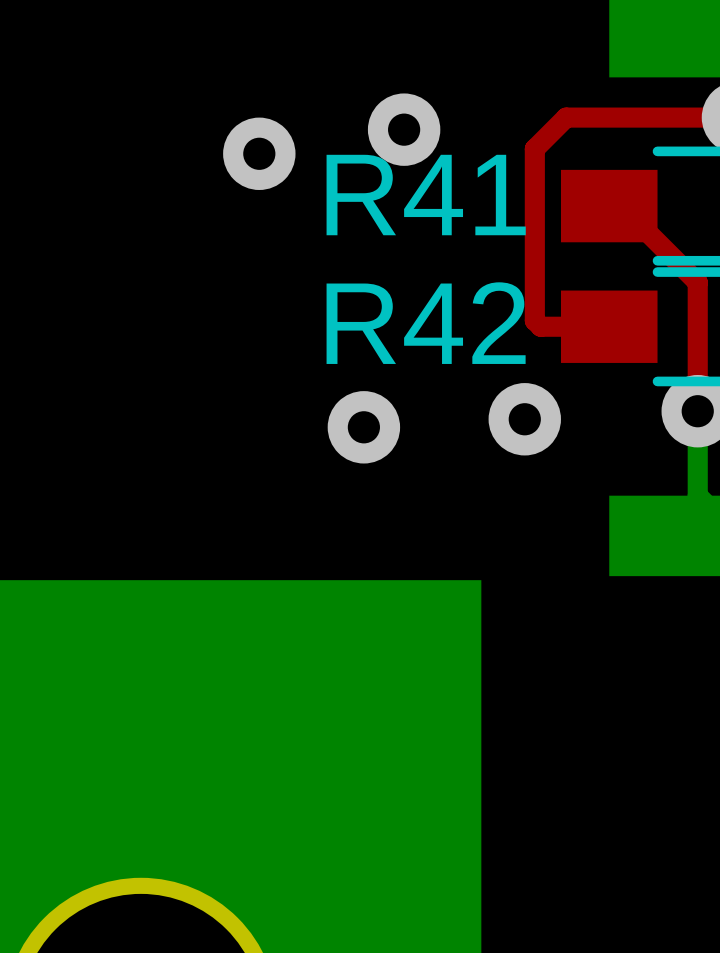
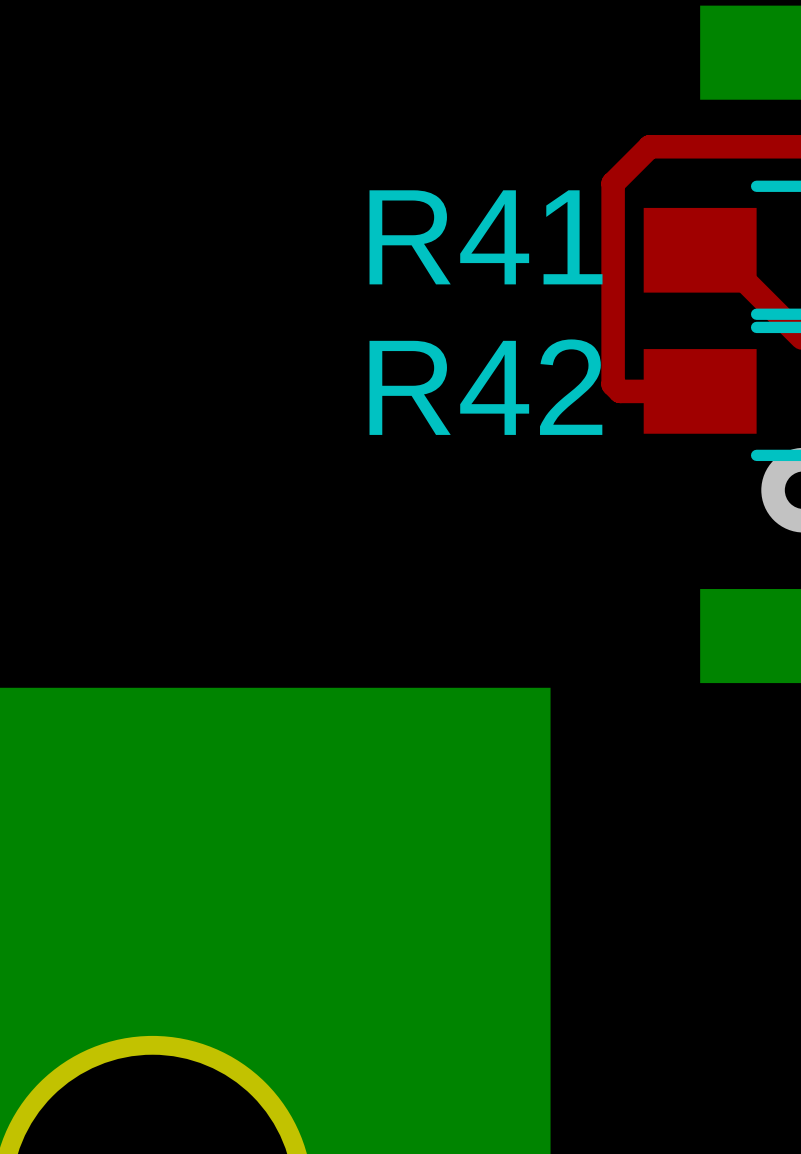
via: (404, 129) -> none
via: (259, 153) -> none
via: (524, 419) -> none
via: (363, 427) -> none

